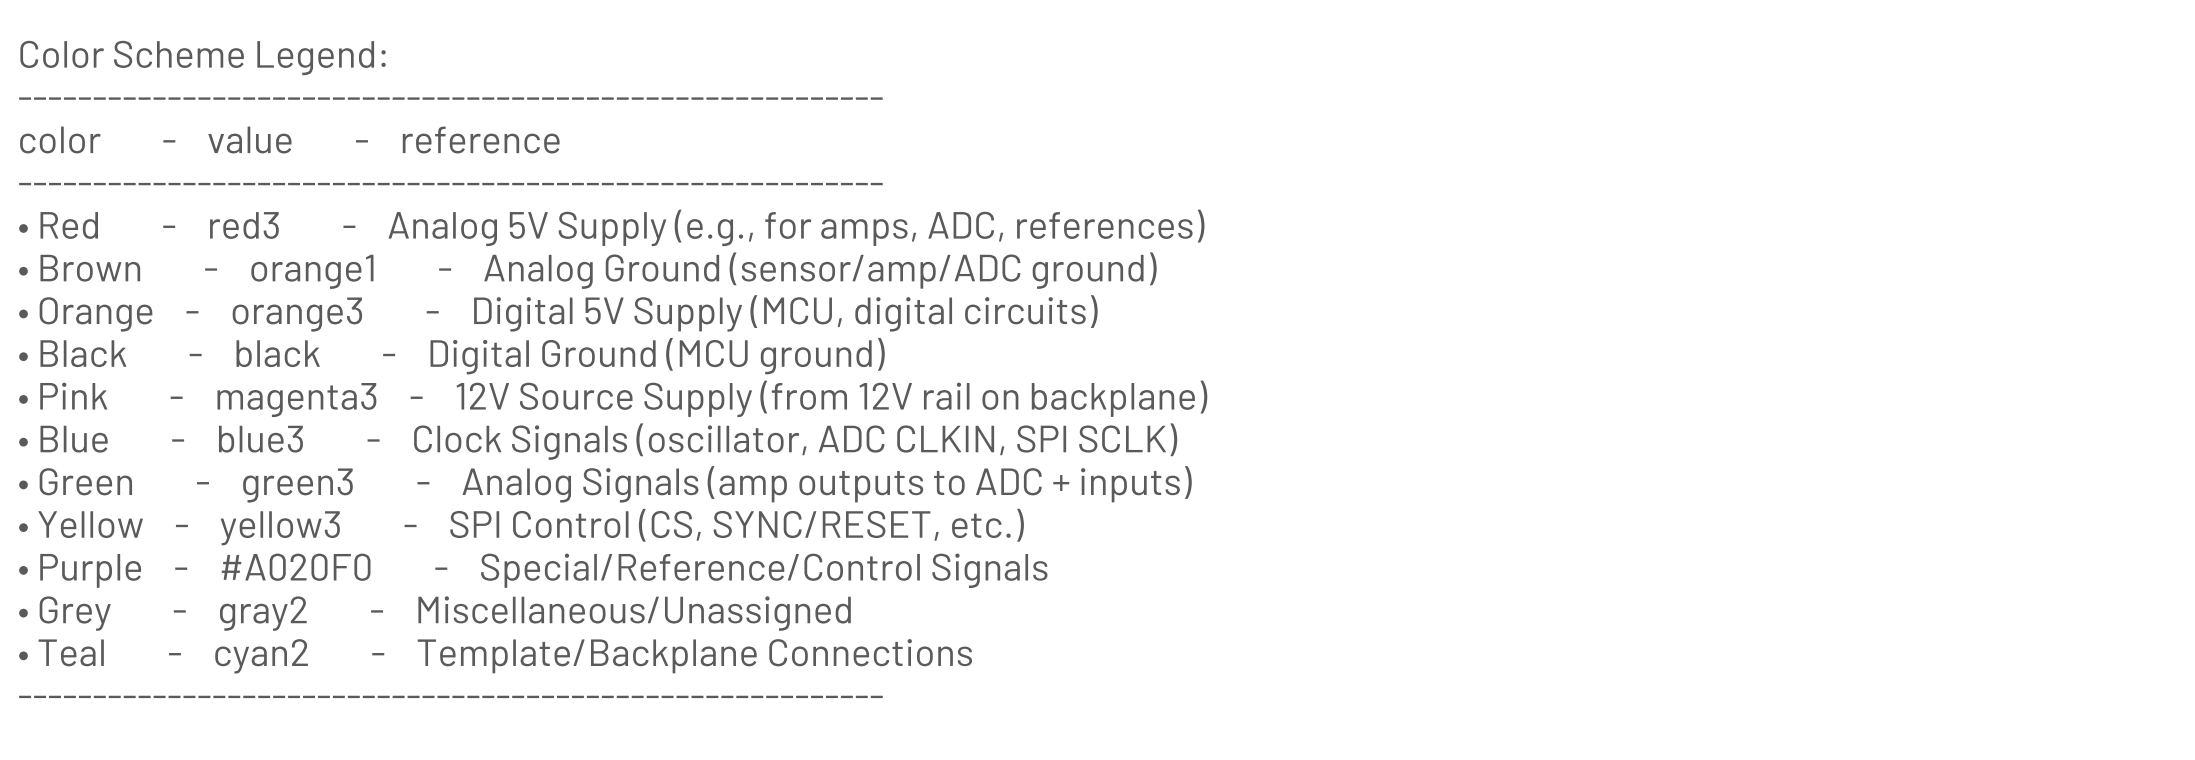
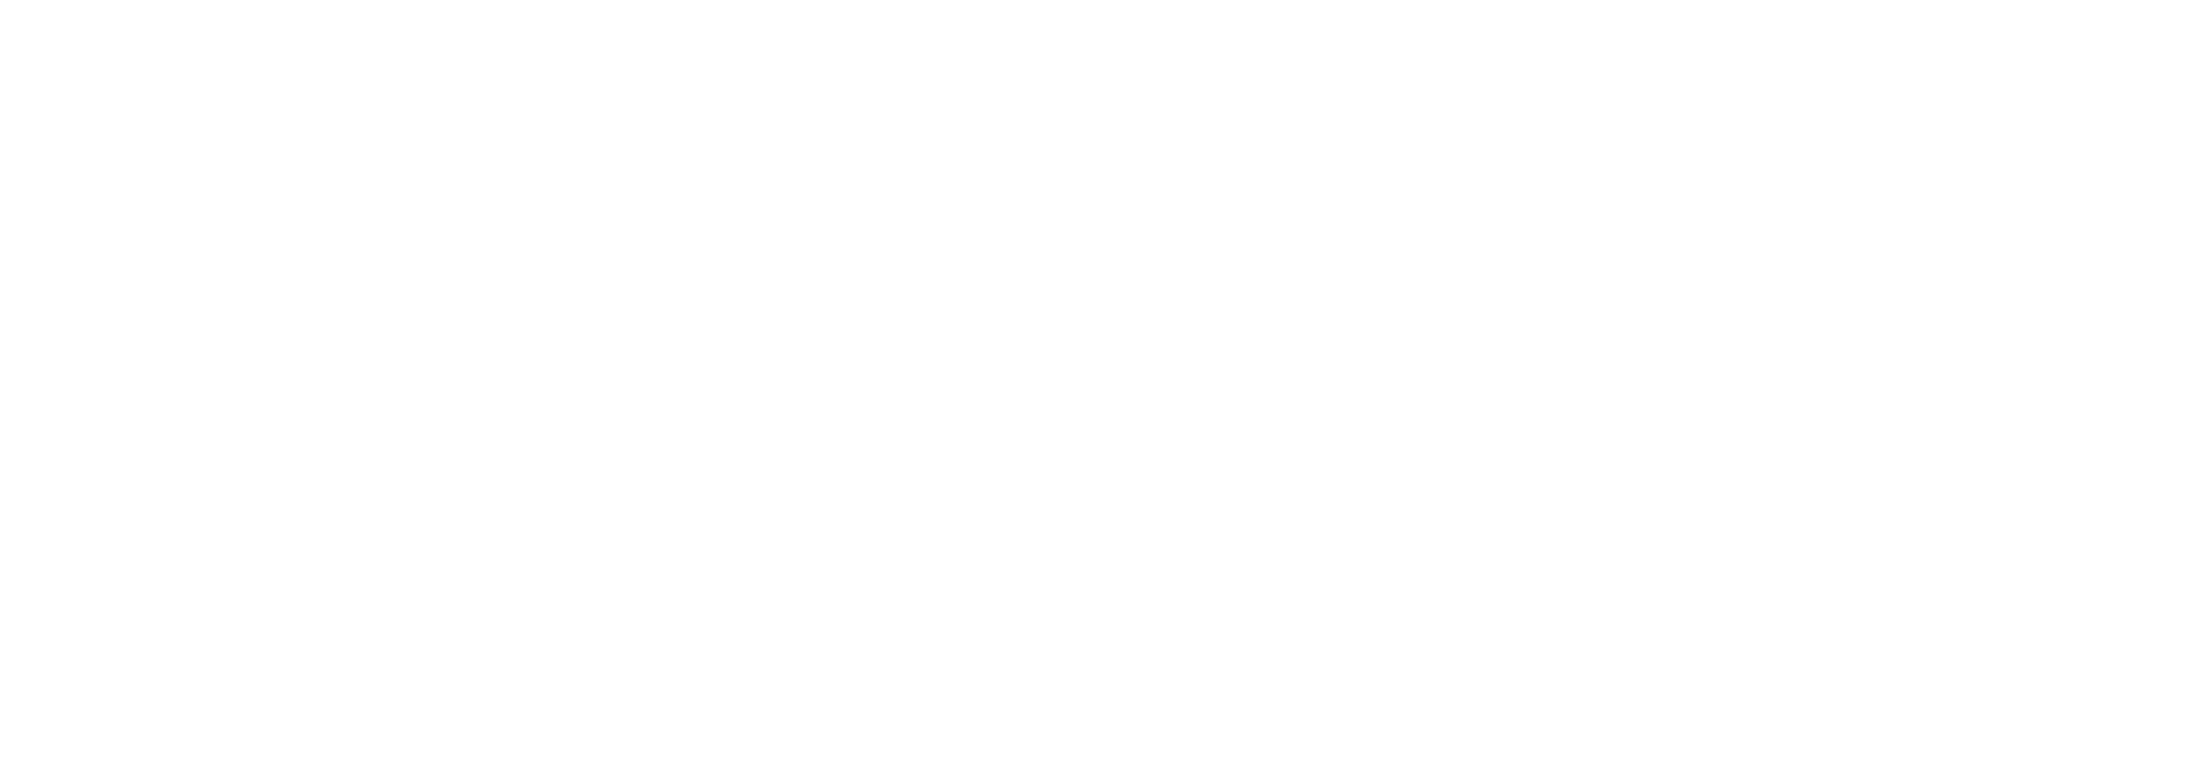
text: Color Scheme Legend: (203, 57) -> none
text: ---------------------------------------------------------- (450, 98) -> none
text: color - value - reference (289, 140) -> none
text: ---------------------------------------------------------- (450, 184) -> none
text: • Red - red3 - Analog 5V Supply (e.g., for amps, ADC, references) (611, 227) -> none
text: • Brown - orange1 - Analog Ground (sensor/amp/ADC ground) (587, 270) -> none
text: • Orange - orange3 - Digital 5V Supply (MCU, digital circuits) (558, 313) -> none
text: • Black - black - Digital Ground (MCU ground) (451, 356) -> none
text: • Pink - magenta3 - 12V Source Supply (from 12V rail on backplane) (613, 398) -> none
text: • Blue - blue3 - Clock Signals (oscillator, ADC CLKIN, SPI SCLK) (598, 441) -> none
text: • Green - green3 - Analog Signals (amp outputs to ADC + inputs) (605, 484) -> none
text: • Yellow - yellow3 - SPI Control (CS, SYNC/RESET, etc.) (521, 527) -> none
text: • Purple - #A020F0 - Special/Reference/Control Signals (533, 570) -> none
text: • Grey - gray2 - Miscellaneous/Unassigned (434, 613) -> none
text: • Teal - cyan2 - Template/Backplane Connections (495, 656) -> none
text: ---------------------------------------------------------- (450, 696) -> none

